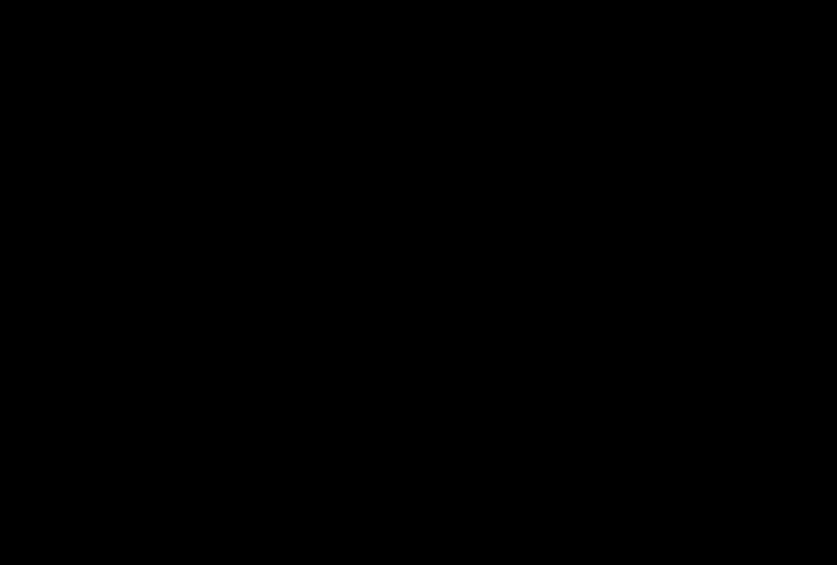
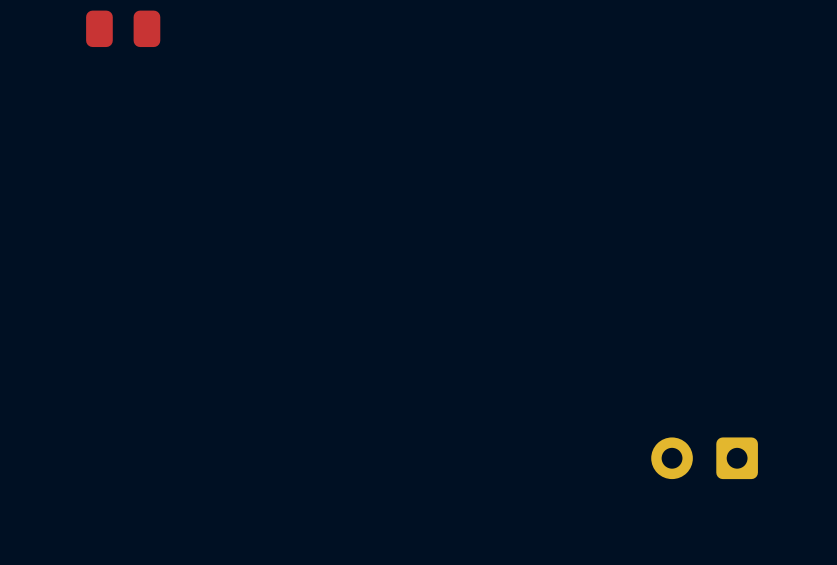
part: none -> (123, 28)
part: none -> (704, 458)

